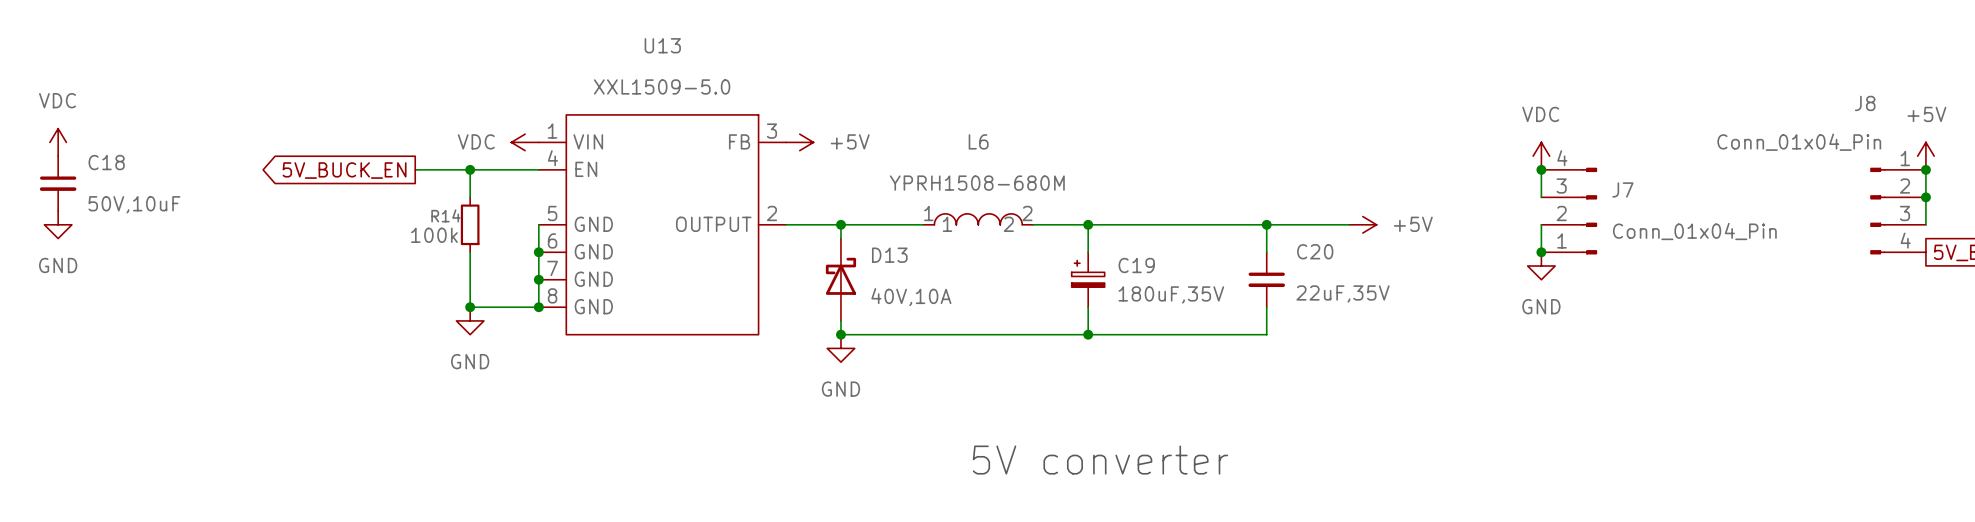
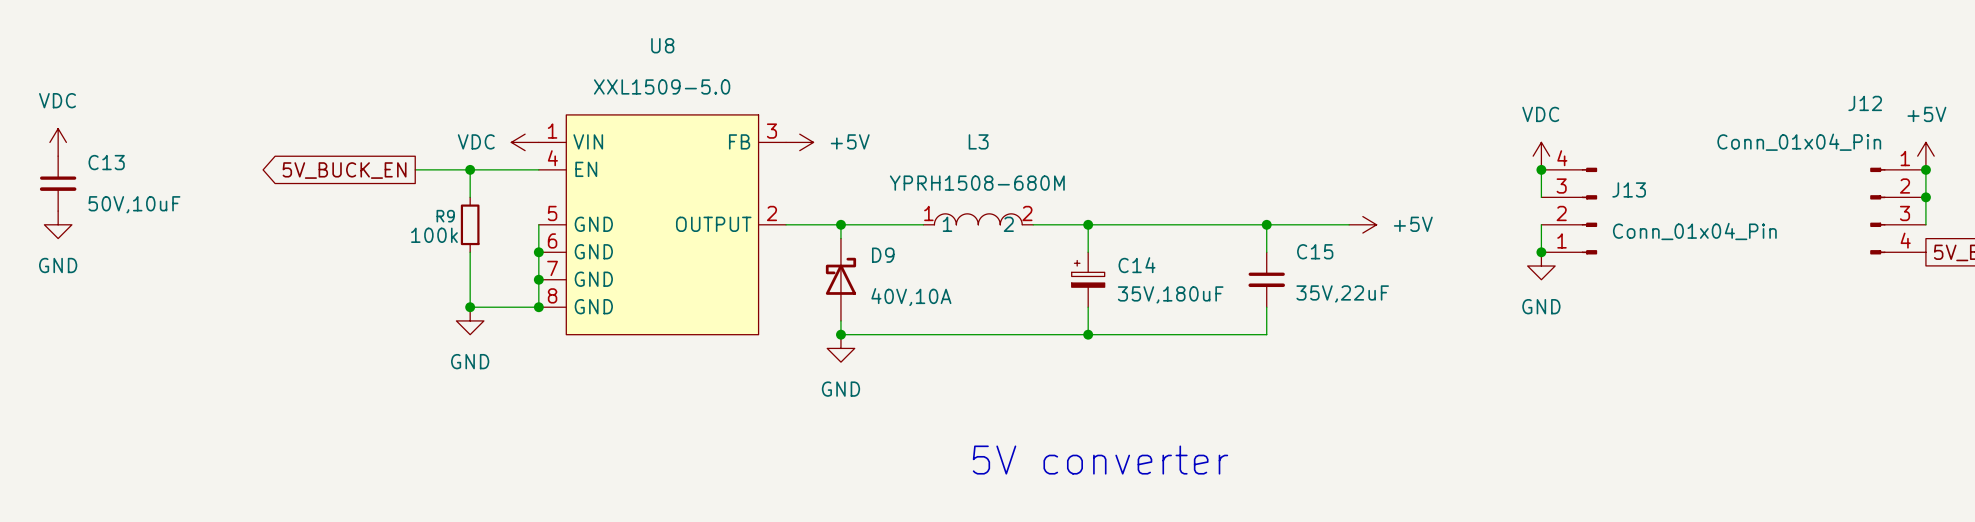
U13 name: U13 (662, 45) -> U8 (662, 45)
J8 name: J8 (1865, 103) -> J12 (1865, 103)
L6 name: L6 (978, 141) -> L3 (978, 141)
C18 name: C18 (106, 162) -> C13 (106, 162)
J7 name: J7 (1622, 189) -> J13 (1629, 189)
R14 name: R14 (445, 215) -> R9 (445, 216)
C20 name: C20 (1315, 251) -> C15 (1315, 251)
D13 name: D13 (889, 255) -> D9 (883, 255)
C19 name: C19 (1136, 265) -> C14 (1137, 265)
C20 value: 22uF,35V (1343, 293) -> 35V,22uF (1342, 293)
C19 value: 180uF,35V (1171, 294) -> 35V,180uF (1170, 294)

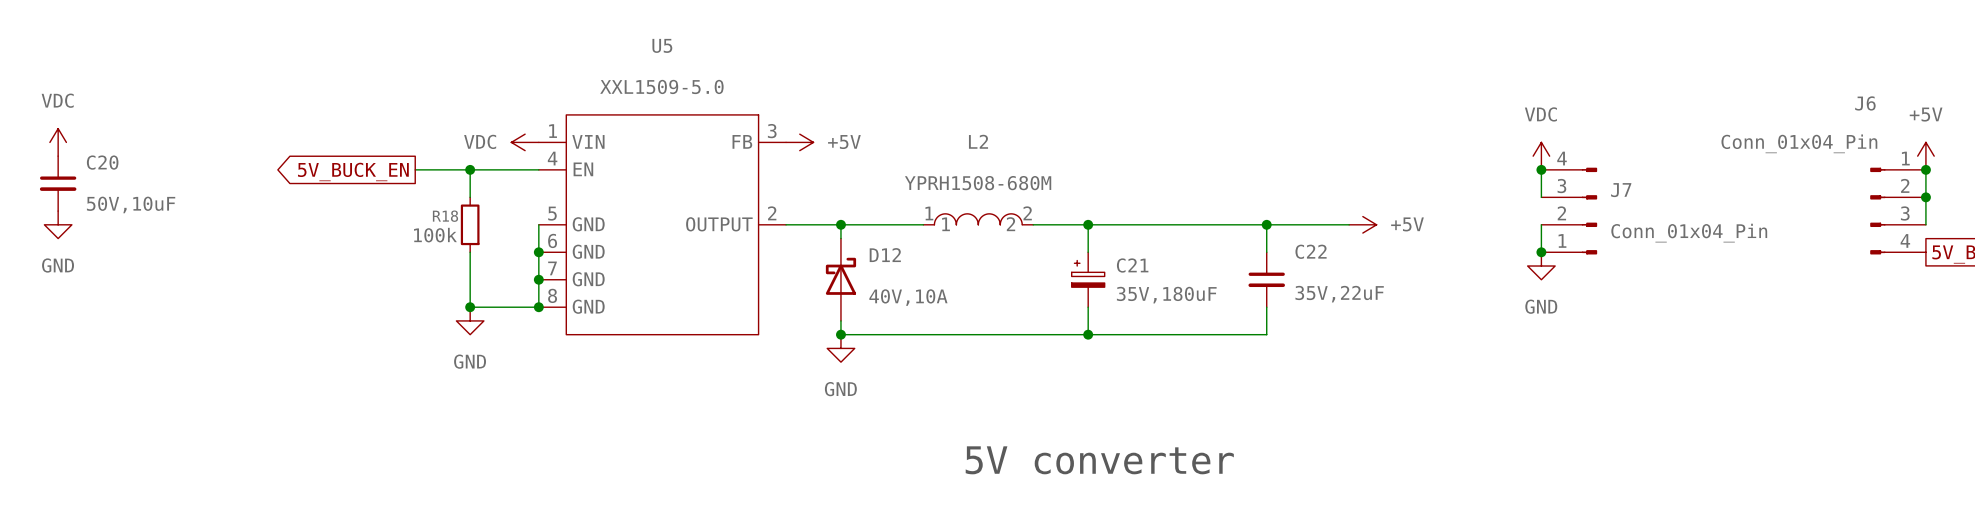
U8 name: U8 (662, 45) -> U5 (662, 45)
J12 name: J12 (1865, 103) -> J6 (1865, 103)
L3 name: L3 (978, 141) -> L2 (978, 141)
C13 name: C13 (106, 162) -> C20 (102, 162)
J13 name: J13 (1629, 189) -> J7 (1621, 190)
R9 name: R9 (445, 216) -> R18 (445, 216)
C15 name: C15 (1315, 251) -> C22 (1311, 251)
D9 name: D9 (883, 255) -> D12 (885, 255)
C14 name: C14 (1137, 265) -> C21 (1132, 265)

